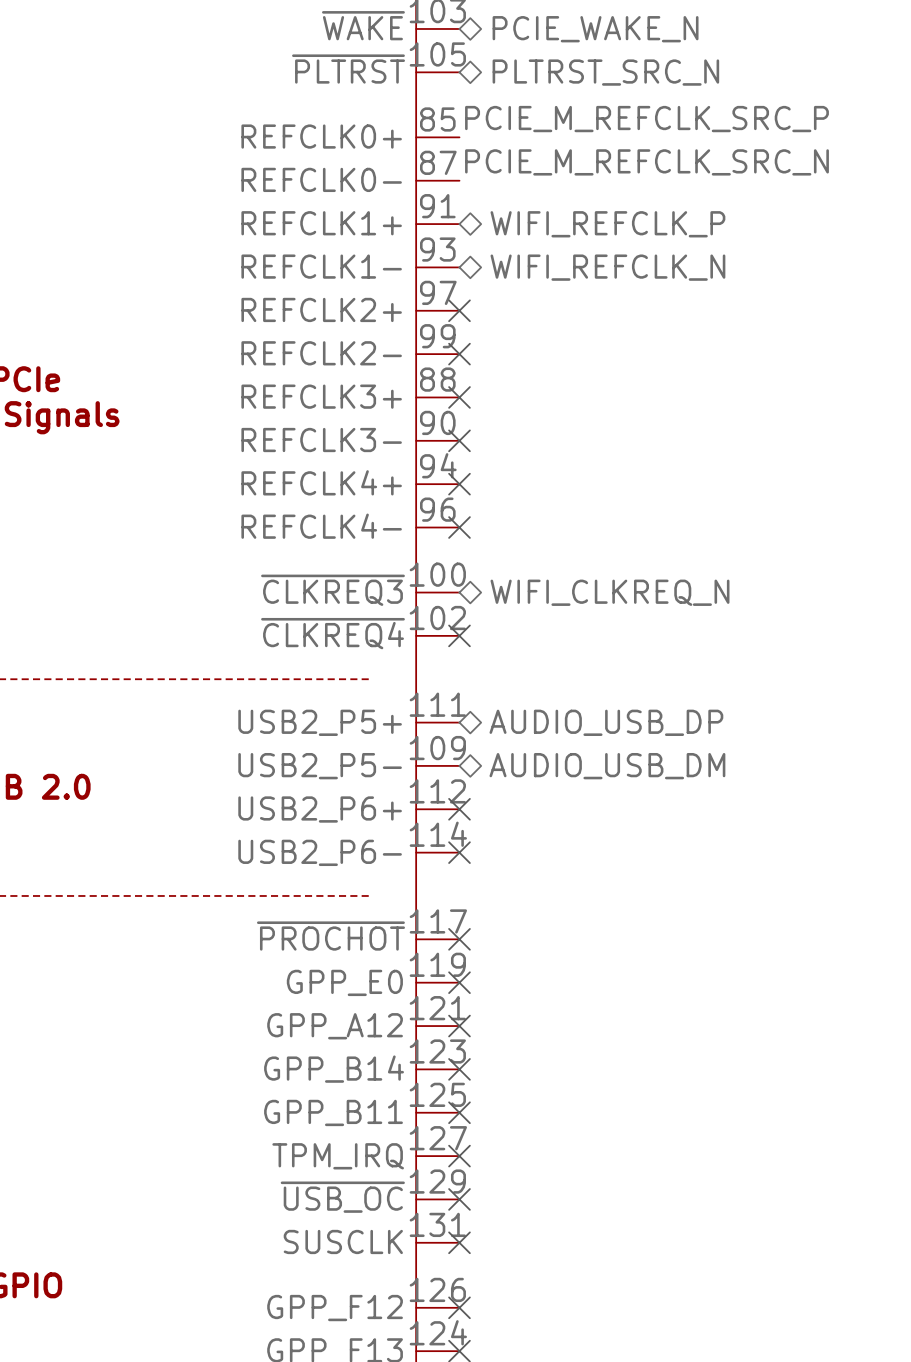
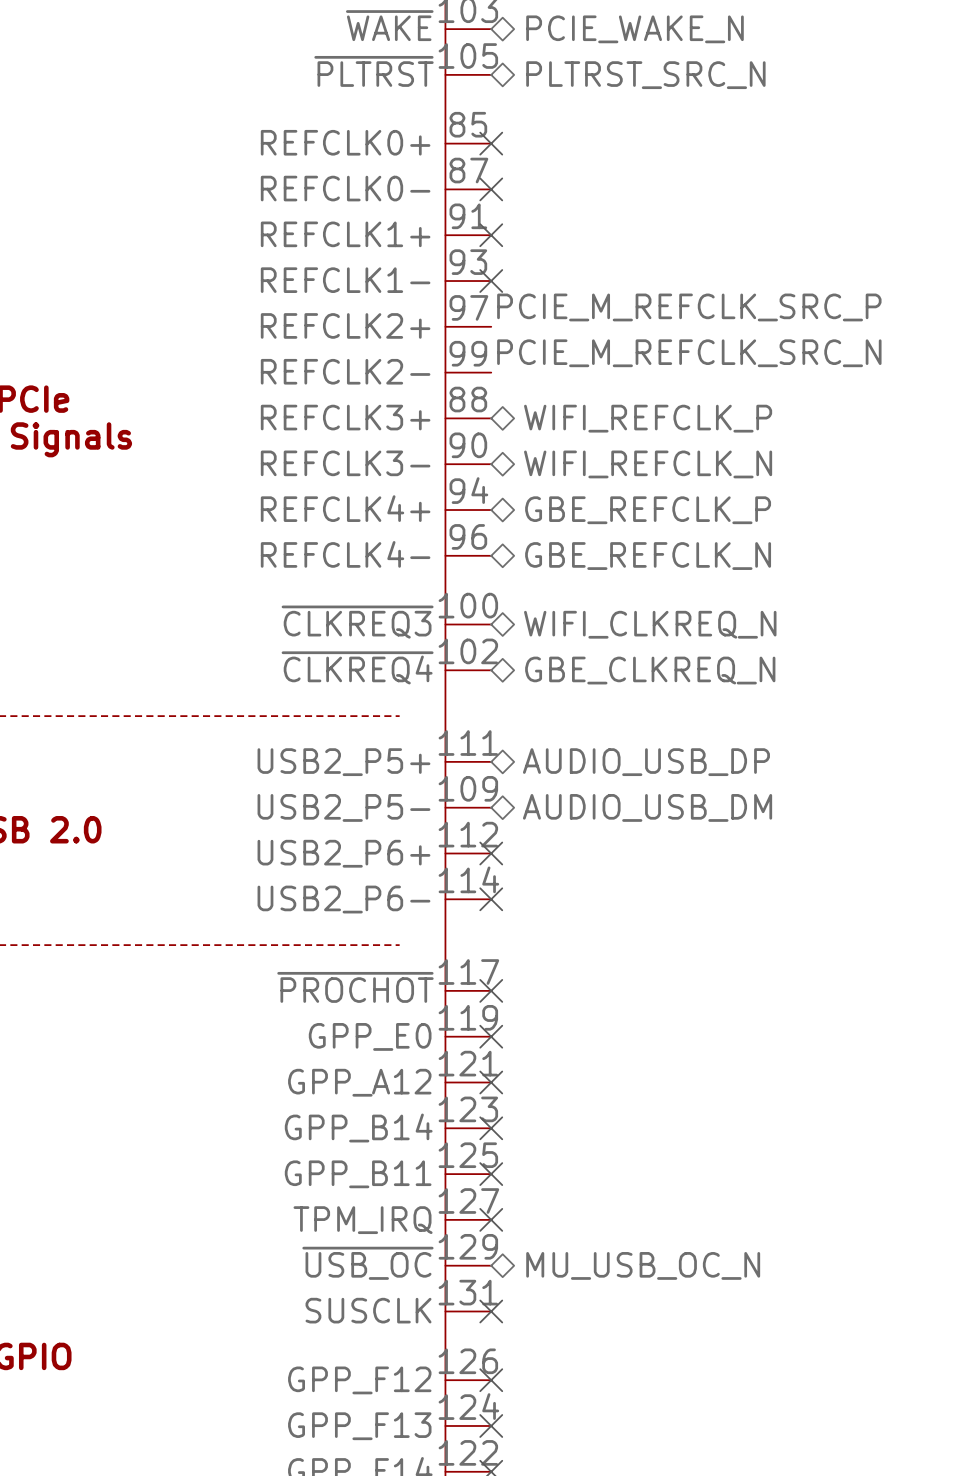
label position: PCIE_M_REFCLK_SRC_P (646, 119) -> PCIE_M_REFCLK_SRC_P (689, 307)
no-connect mark: none -> (491, 143)
label position: PCIE_M_REFCLK_SRC_N (646, 162) -> PCIE_M_REFCLK_SRC_N (689, 353)
no-connect mark: none -> (491, 189)
no-connect mark: none -> (491, 235)
hierarchical label position: WIFI_REFCLK_P (607, 224) -> WIFI_REFCLK_P (648, 418)
no-connect mark: none -> (491, 281)
hierarchical label position: WIFI_REFCLK_N (607, 267) -> WIFI_REFCLK_N (648, 464)
no-connect mark: (459, 310) -> none
no-connect mark: (459, 354) -> none
no-connect mark: (459, 397) -> none
no-connect mark: (459, 440) -> none
no-connect mark: (459, 484) -> none
hierarchical label: none -> GBE_REFCLK_P (648, 510)
no-connect mark: (459, 527) -> none
hierarchical label: none -> GBE_REFCLK_N (648, 556)
no-connect mark: (459, 635) -> none
hierarchical label: none -> GBE_CLKREQ_N (650, 670)
no-connect mark: (459, 1199) -> none
hierarchical label: none -> MU_USB_OC_N (643, 1265)

